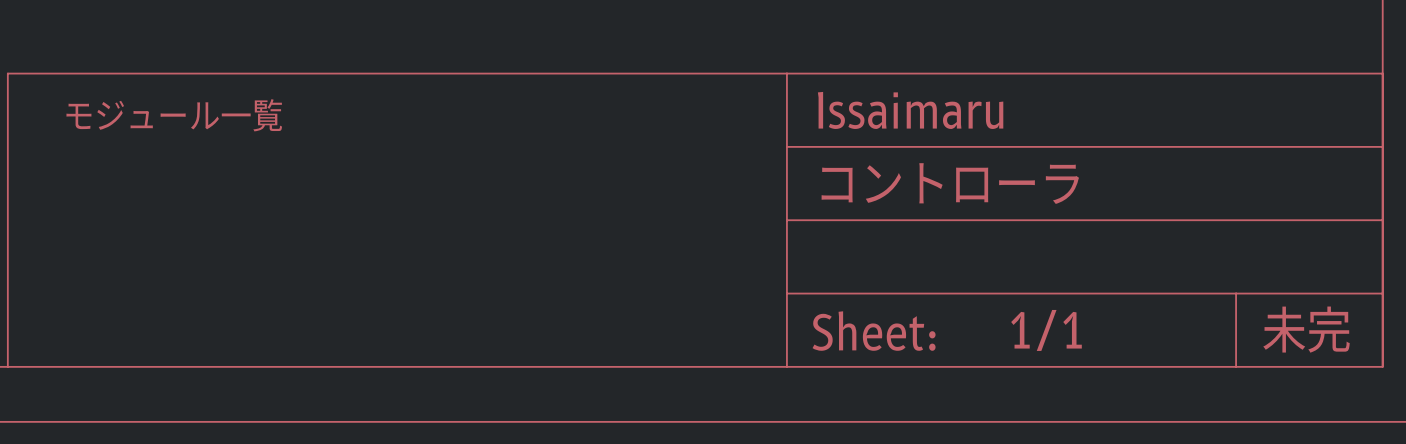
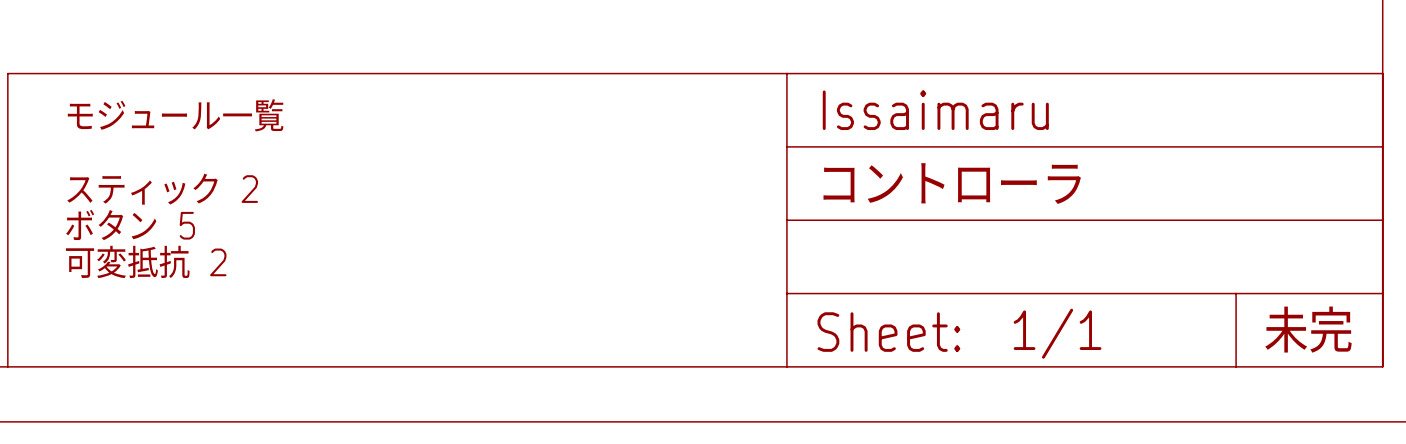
text: none -> スティック 2 (162, 189)
text: none -> ボタン 5 (130, 224)
text: none -> 可変抵抗 2 (145, 261)

